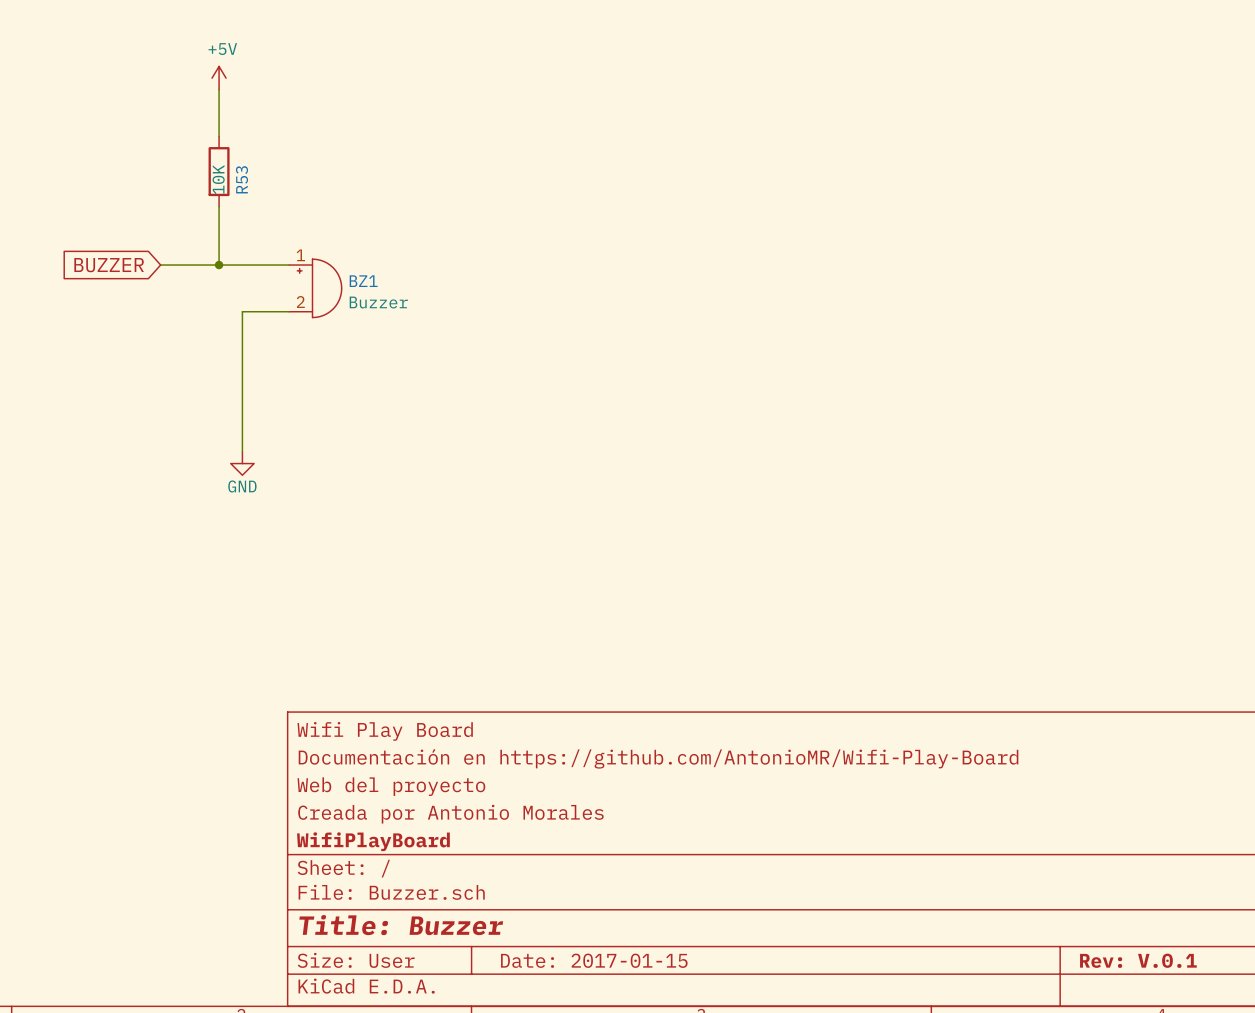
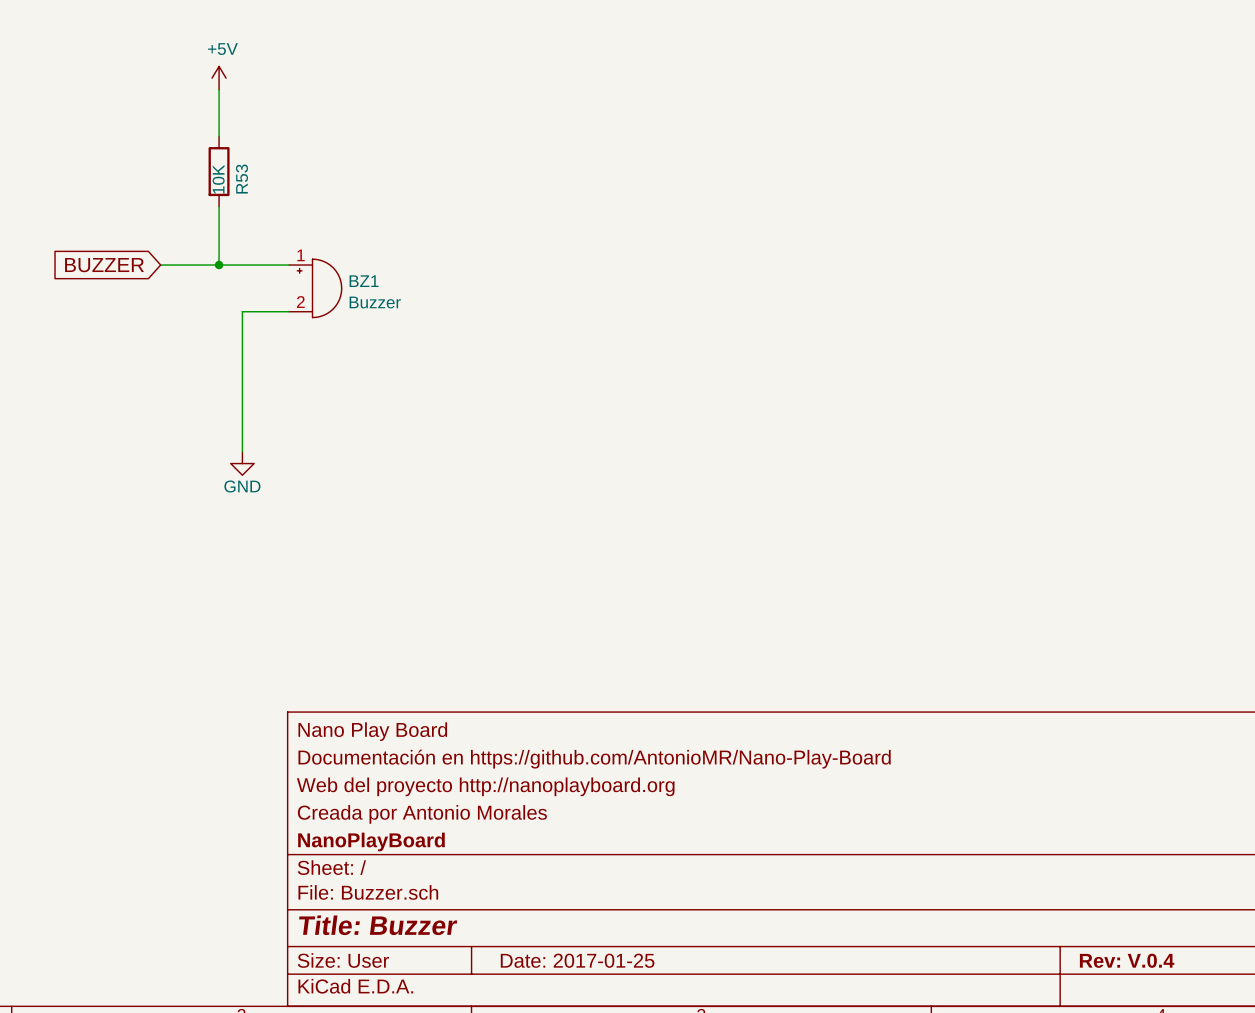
title block: Wifi Play Board (385, 731) -> Nano Play Board (372, 731)
title block: Documentación en https://github.com/AntonioMR/Wifi-Play-Board (658, 758) -> Documentación en https://github.com/AntonioMR/Nano-Play-Board (594, 759)
title block: Web del proyecto (391, 786) -> Web del proyecto http://nanoplayboard.org (485, 786)
title block: WifiPlayBoard (373, 841) -> NanoPlayBoard (371, 842)
title block: Date: 2017-01-15 (594, 960) -> Date: 2017-01-25 (577, 960)
title block: Rev: V.0.1 (1138, 960) -> Rev: V.0.4 (1127, 960)

